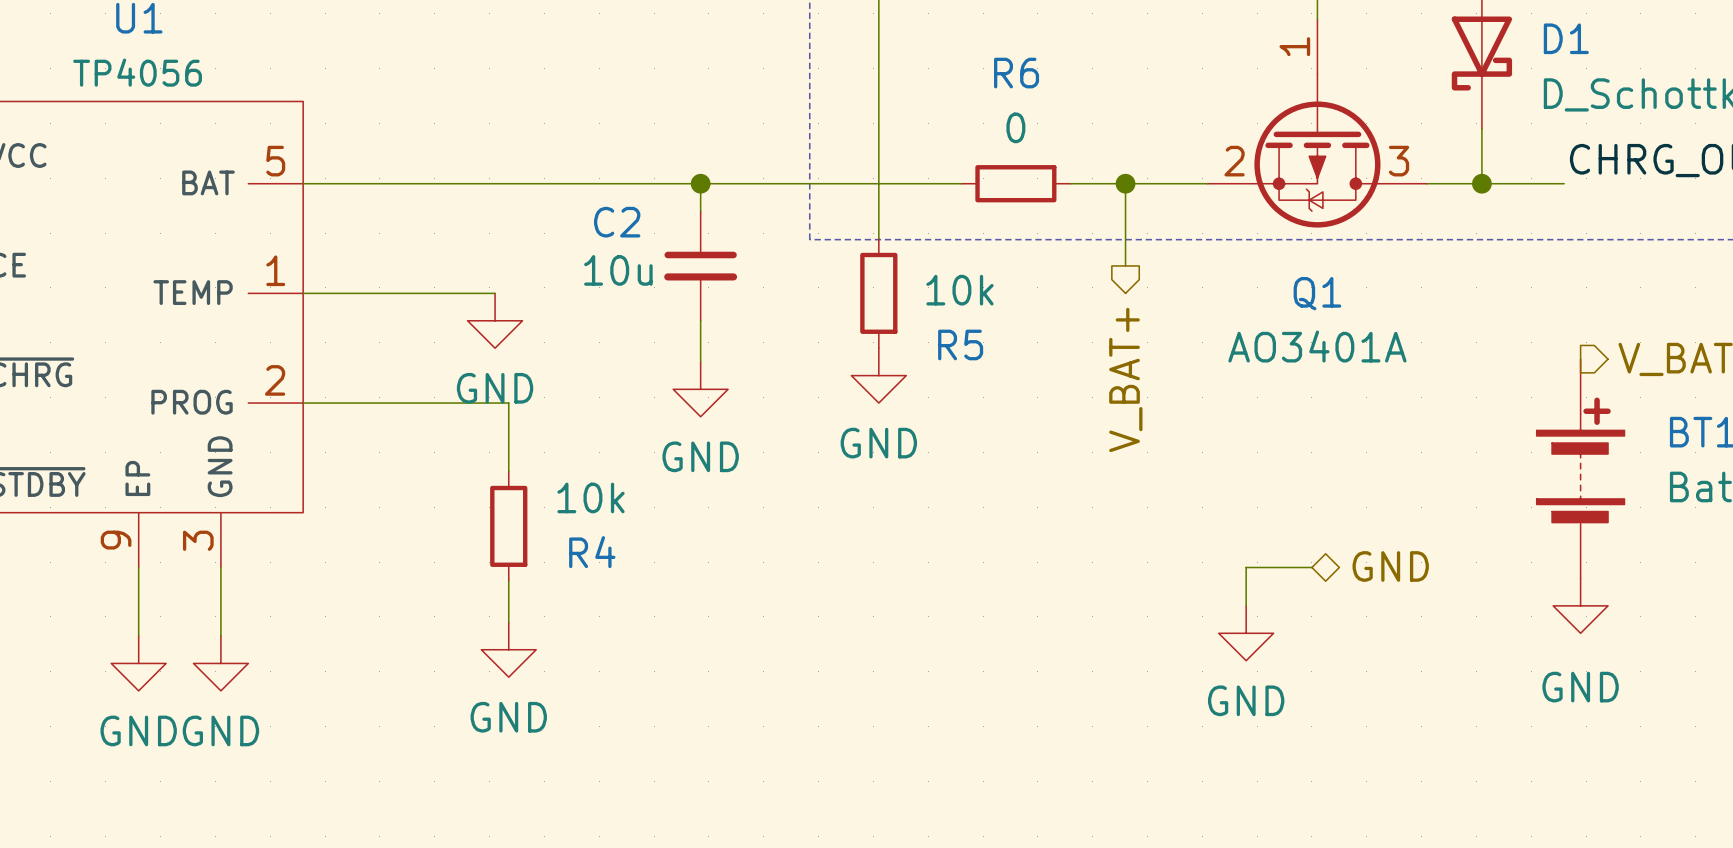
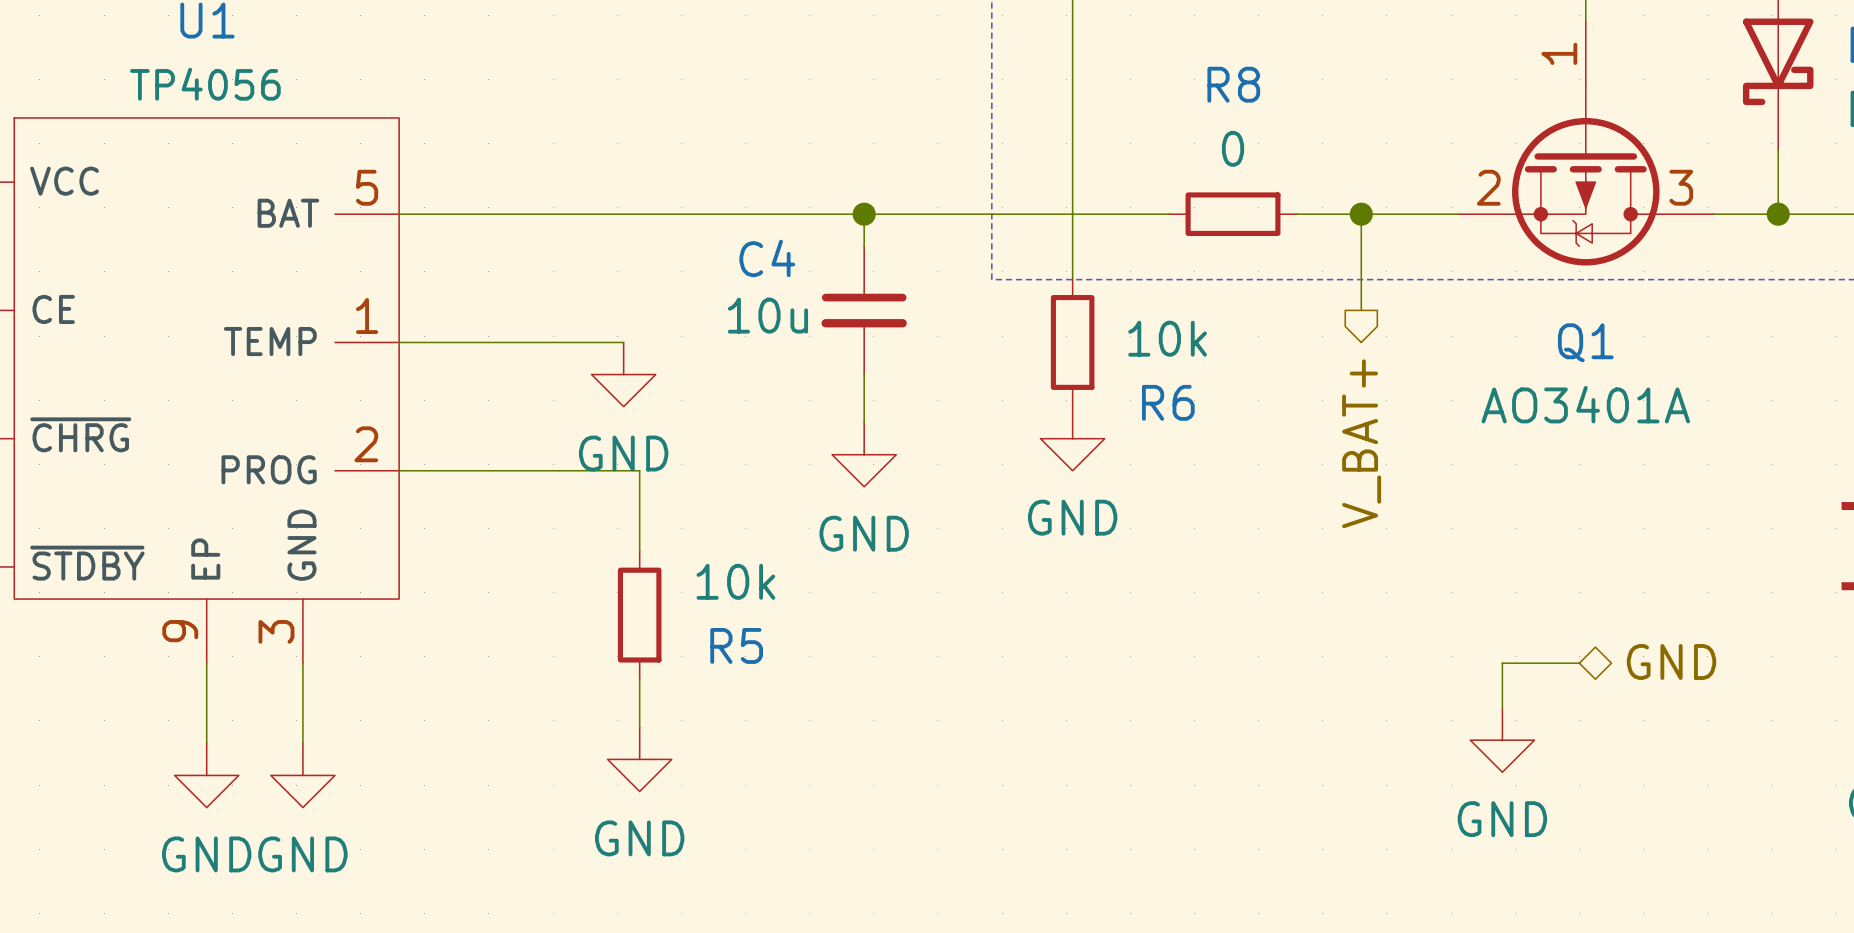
R6 name: R6 (1016, 73) -> R8 (1233, 84)
C2 name: C2 (617, 222) -> C4 (767, 258)
R5 name: R5 (960, 344) -> R6 (1168, 402)
R4 name: R4 (592, 552) -> R5 (736, 645)

